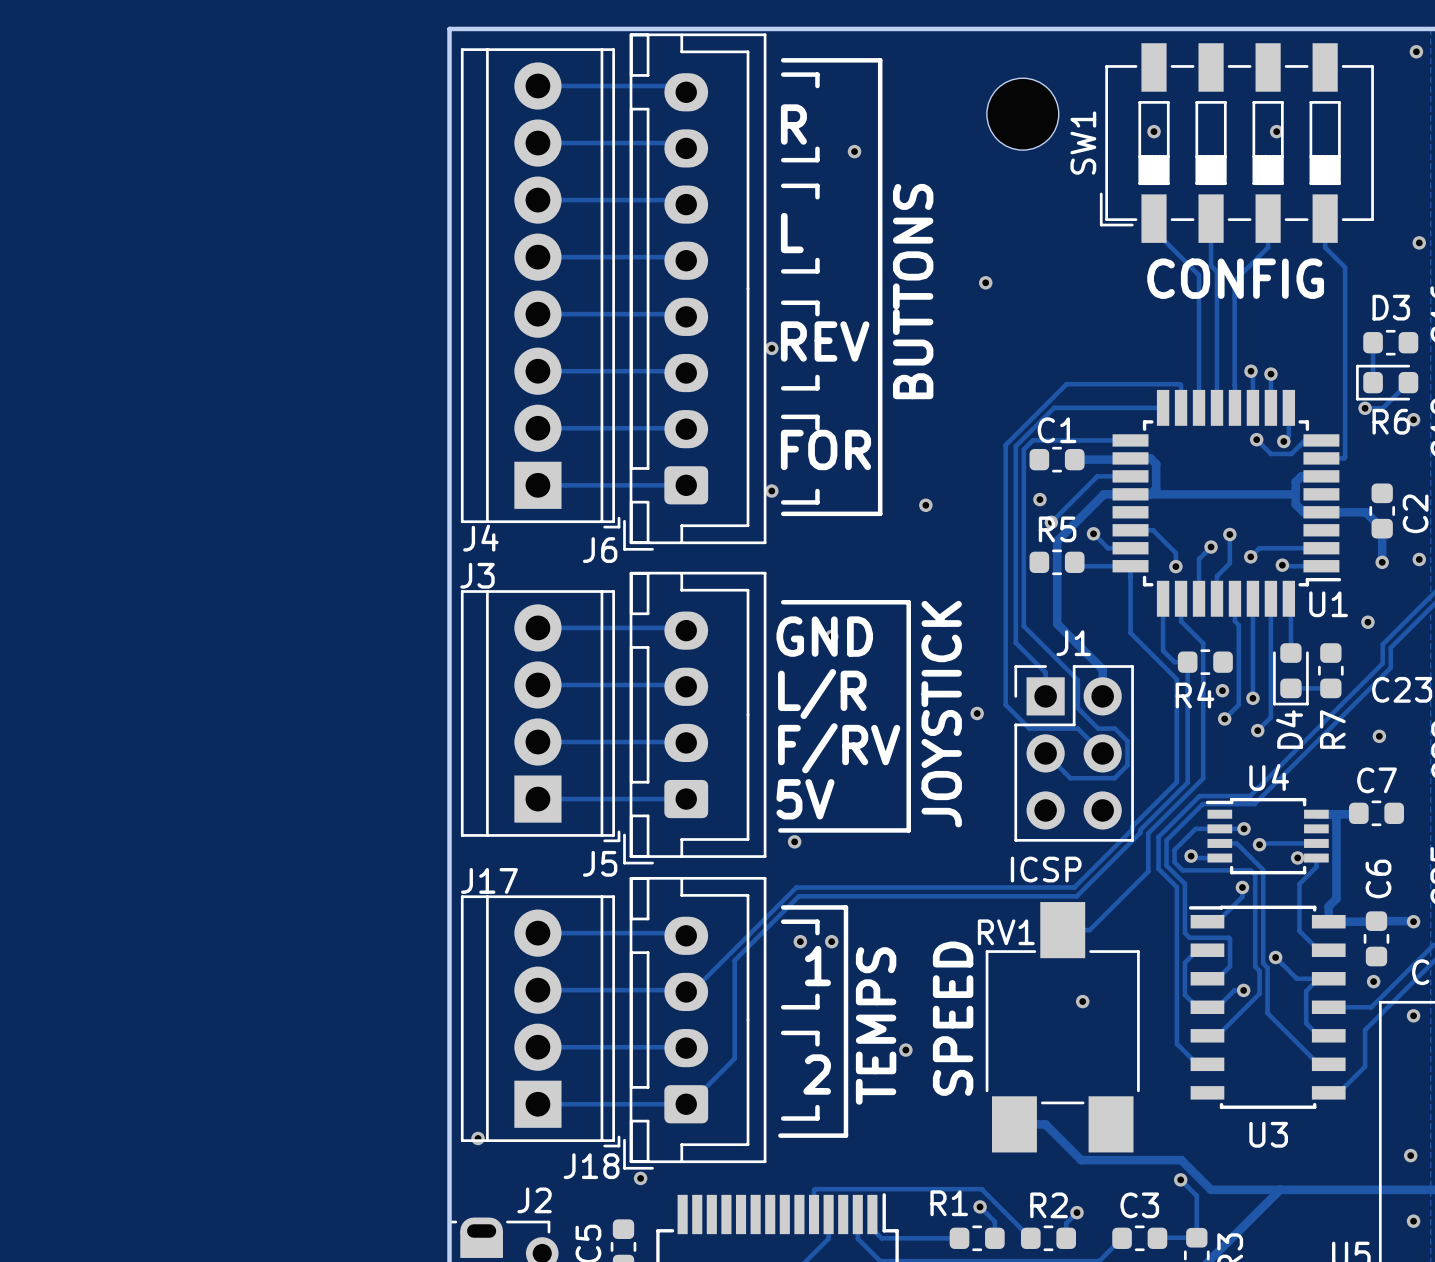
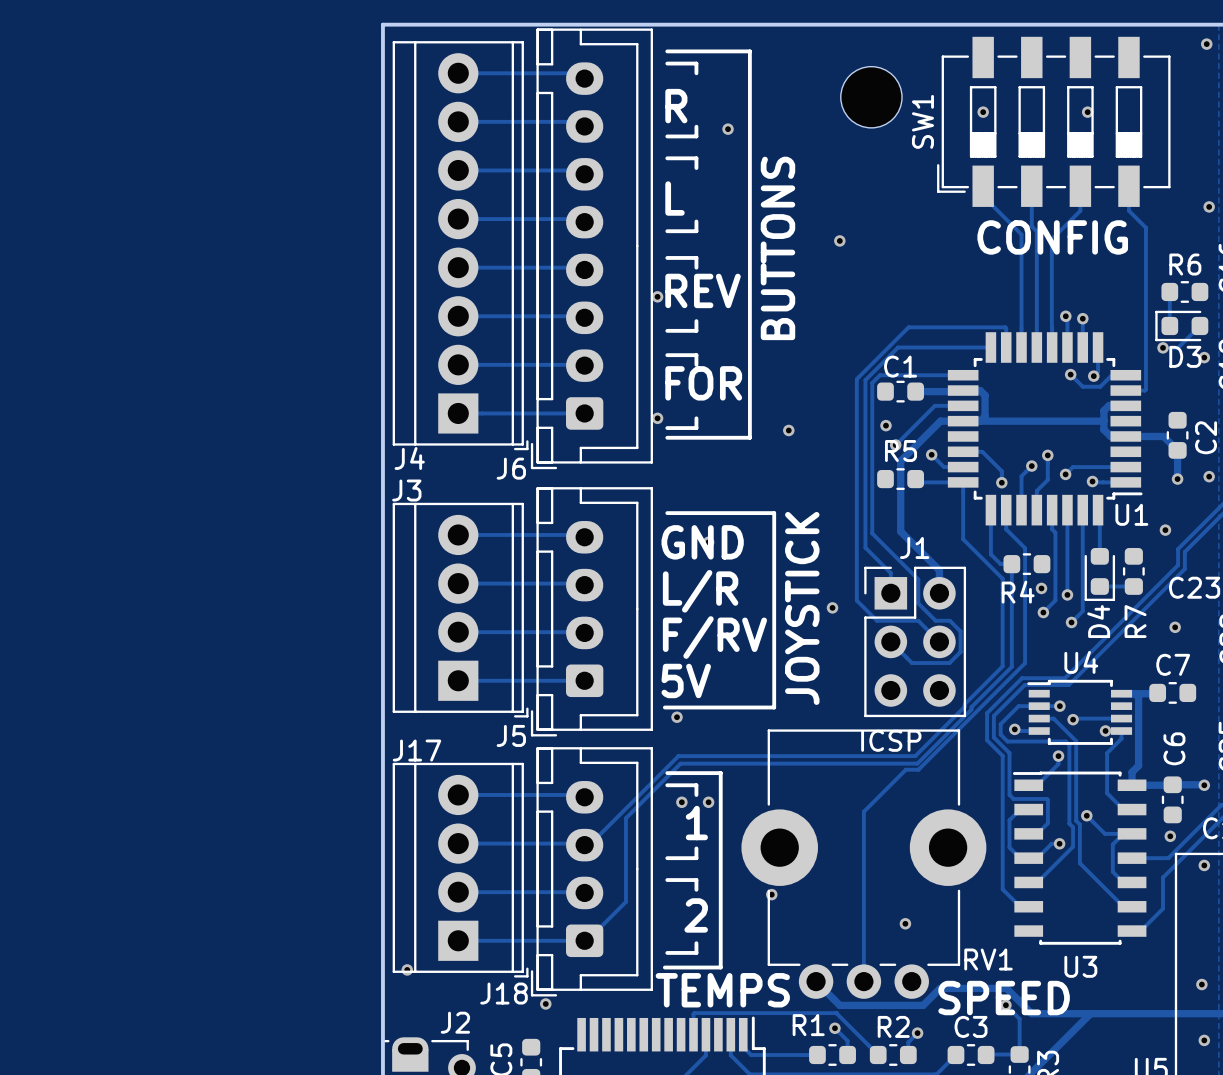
D3 name position: D3 (1391, 307) -> D3 (1185, 356)
R6 name position: R6 (1391, 421) -> R6 (1185, 264)
track: (1148, 833) (1148, 871) (1089, 930) (1062, 930) -> (978, 709) (918, 769) (905, 769) (863, 811) (863, 981)
RV1 footprint: [985, 902, 1140, 1153] -> [741, 729, 987, 999]
RV1 name position: RV1 (1006, 932) -> RV1 (988, 959)
via position: (1082, 1001) -> (905, 923)
text rotation: 0° (953, 1018) -> 90° clockwise (1004, 998)
text position: SPEED (953, 1018) -> SPEED (1004, 998)
text rotation: 0° (876, 1025) -> 90° clockwise (722, 990)
track: (1014, 1124) (1045, 1124) (1081, 1160) (1103, 1160) -> (816, 981) (839, 1005) (923, 1005) (940, 988)

